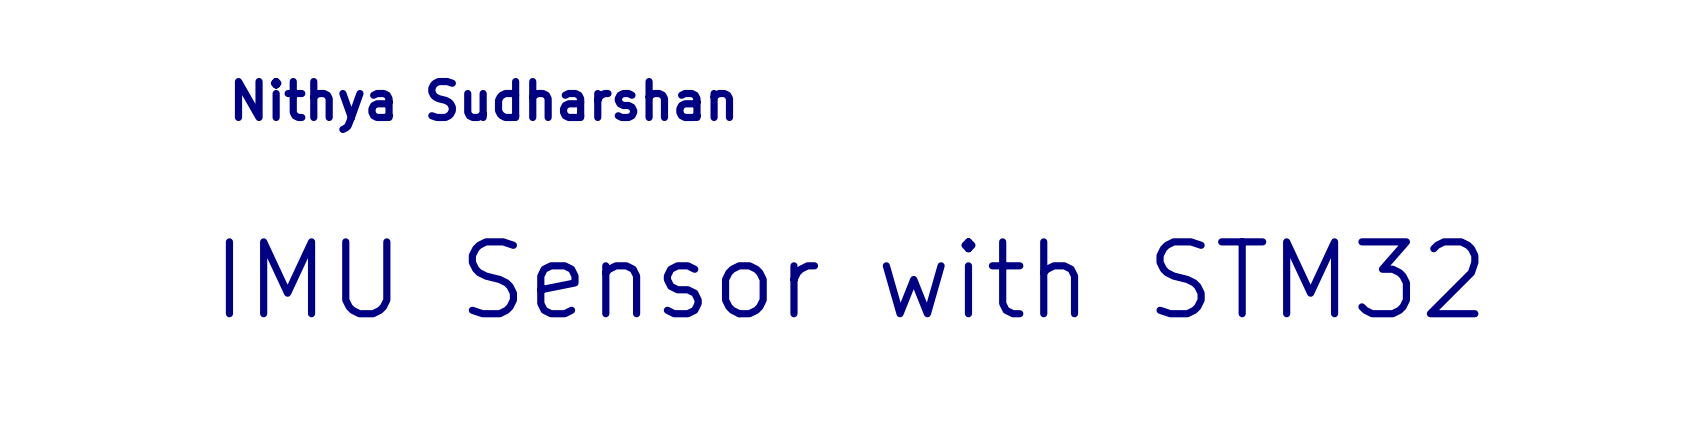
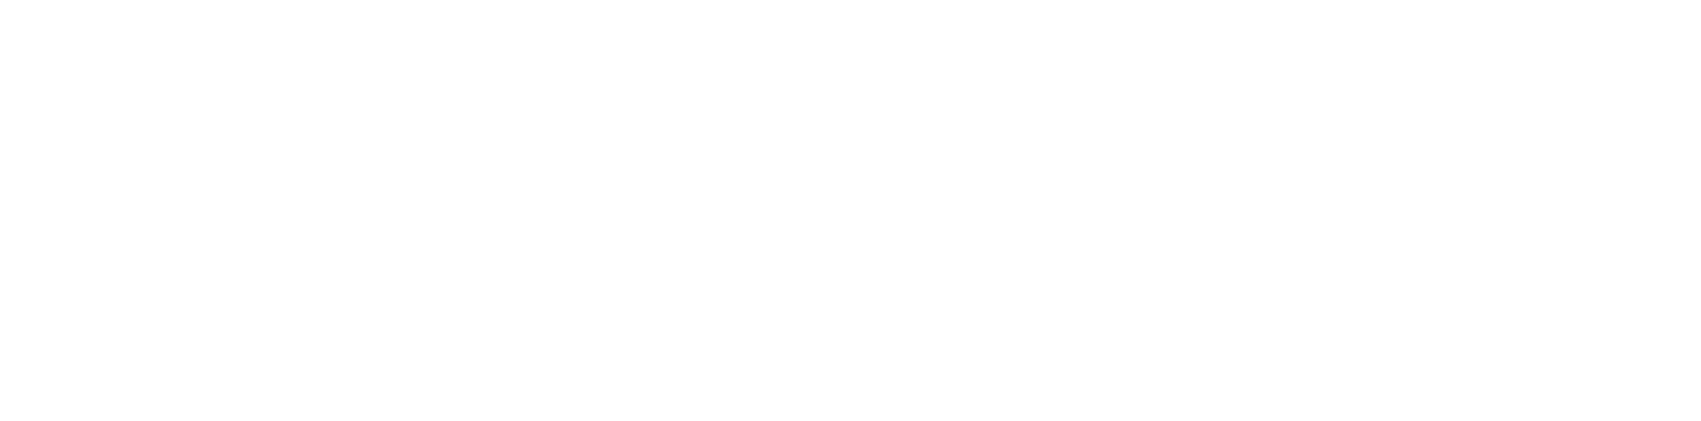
text: Nithya Sudharshan (483, 105) -> none
text: IMU Sensor with STM32 (852, 277) -> none

